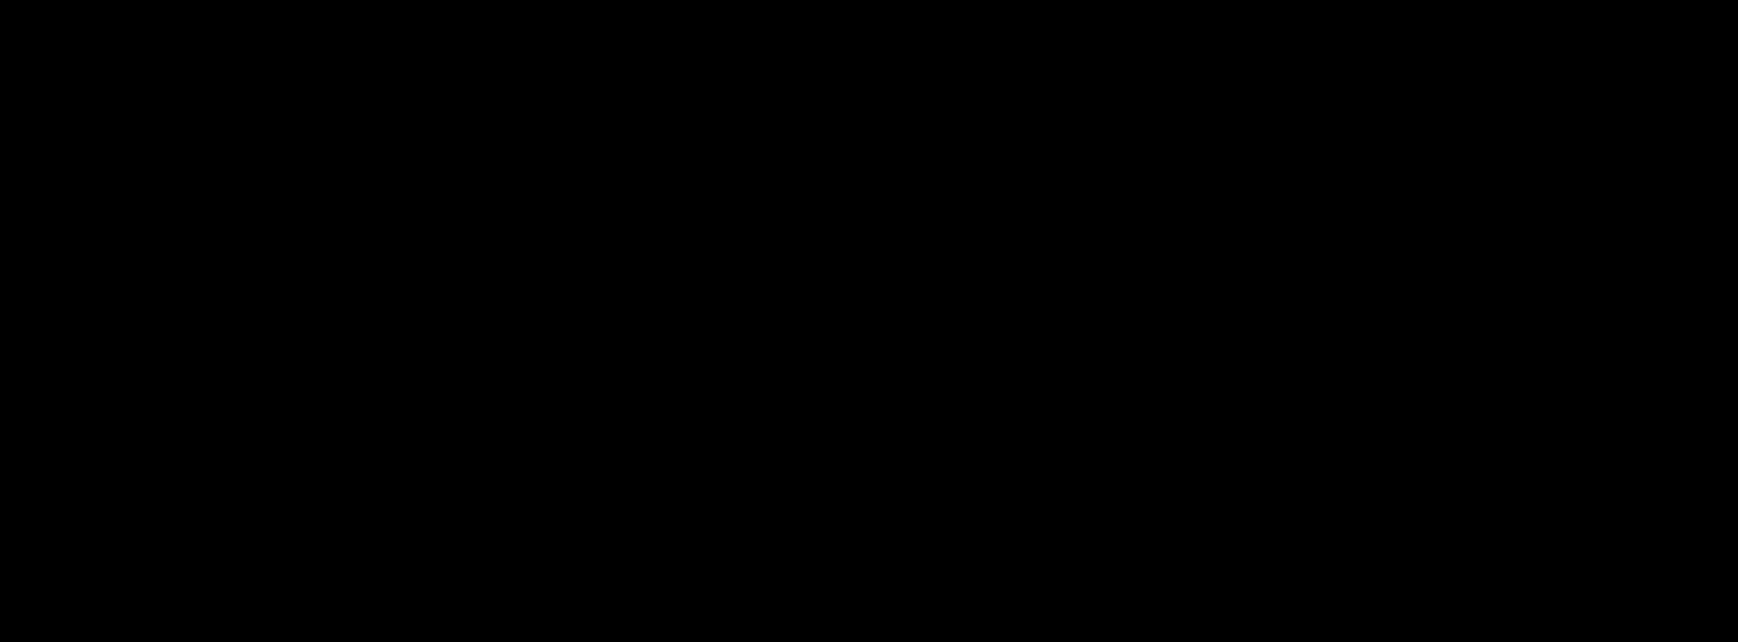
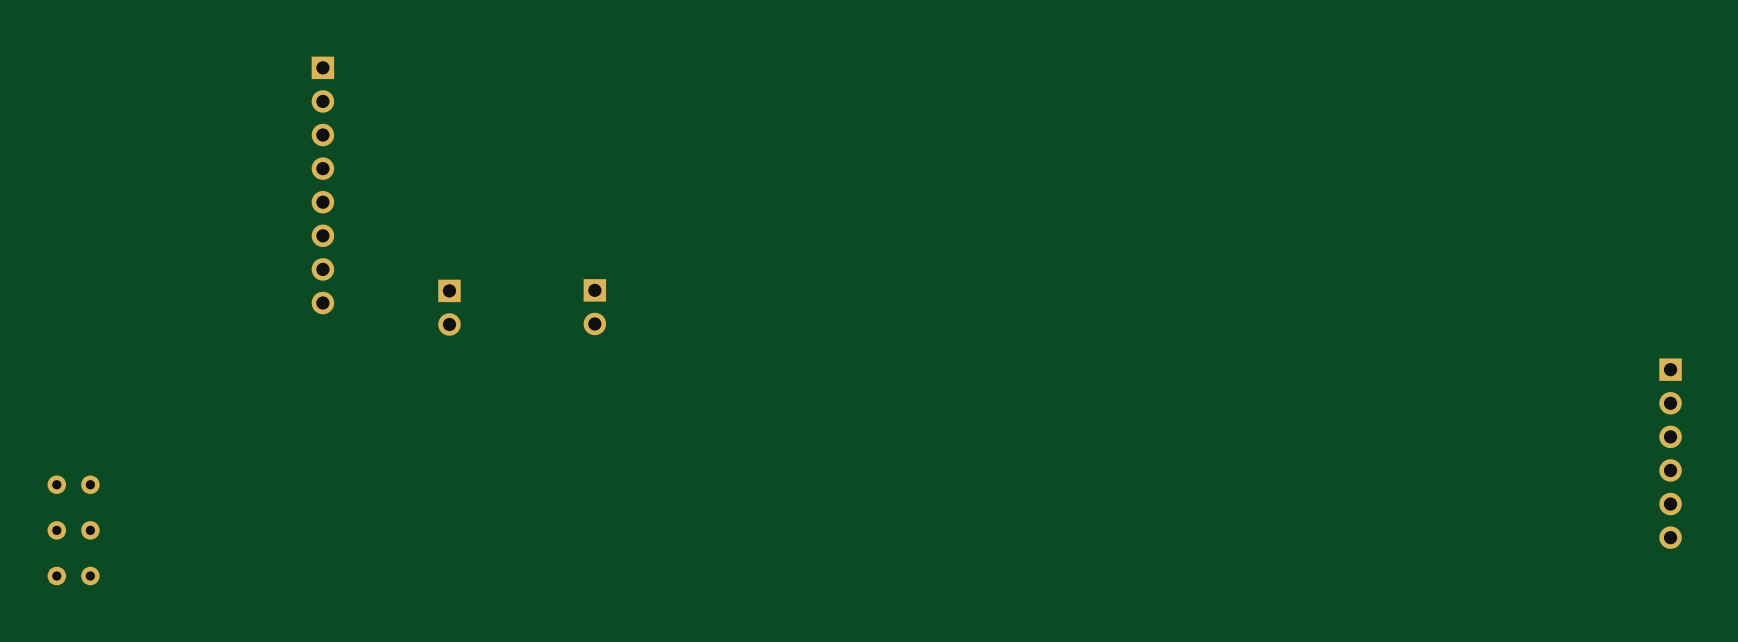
part: none -> (322, 185)
part: none -> (449, 307)
part: none -> (594, 307)
part: none -> (1670, 453)
part: none -> (73, 484)
part: none -> (73, 530)
part: none -> (73, 576)

